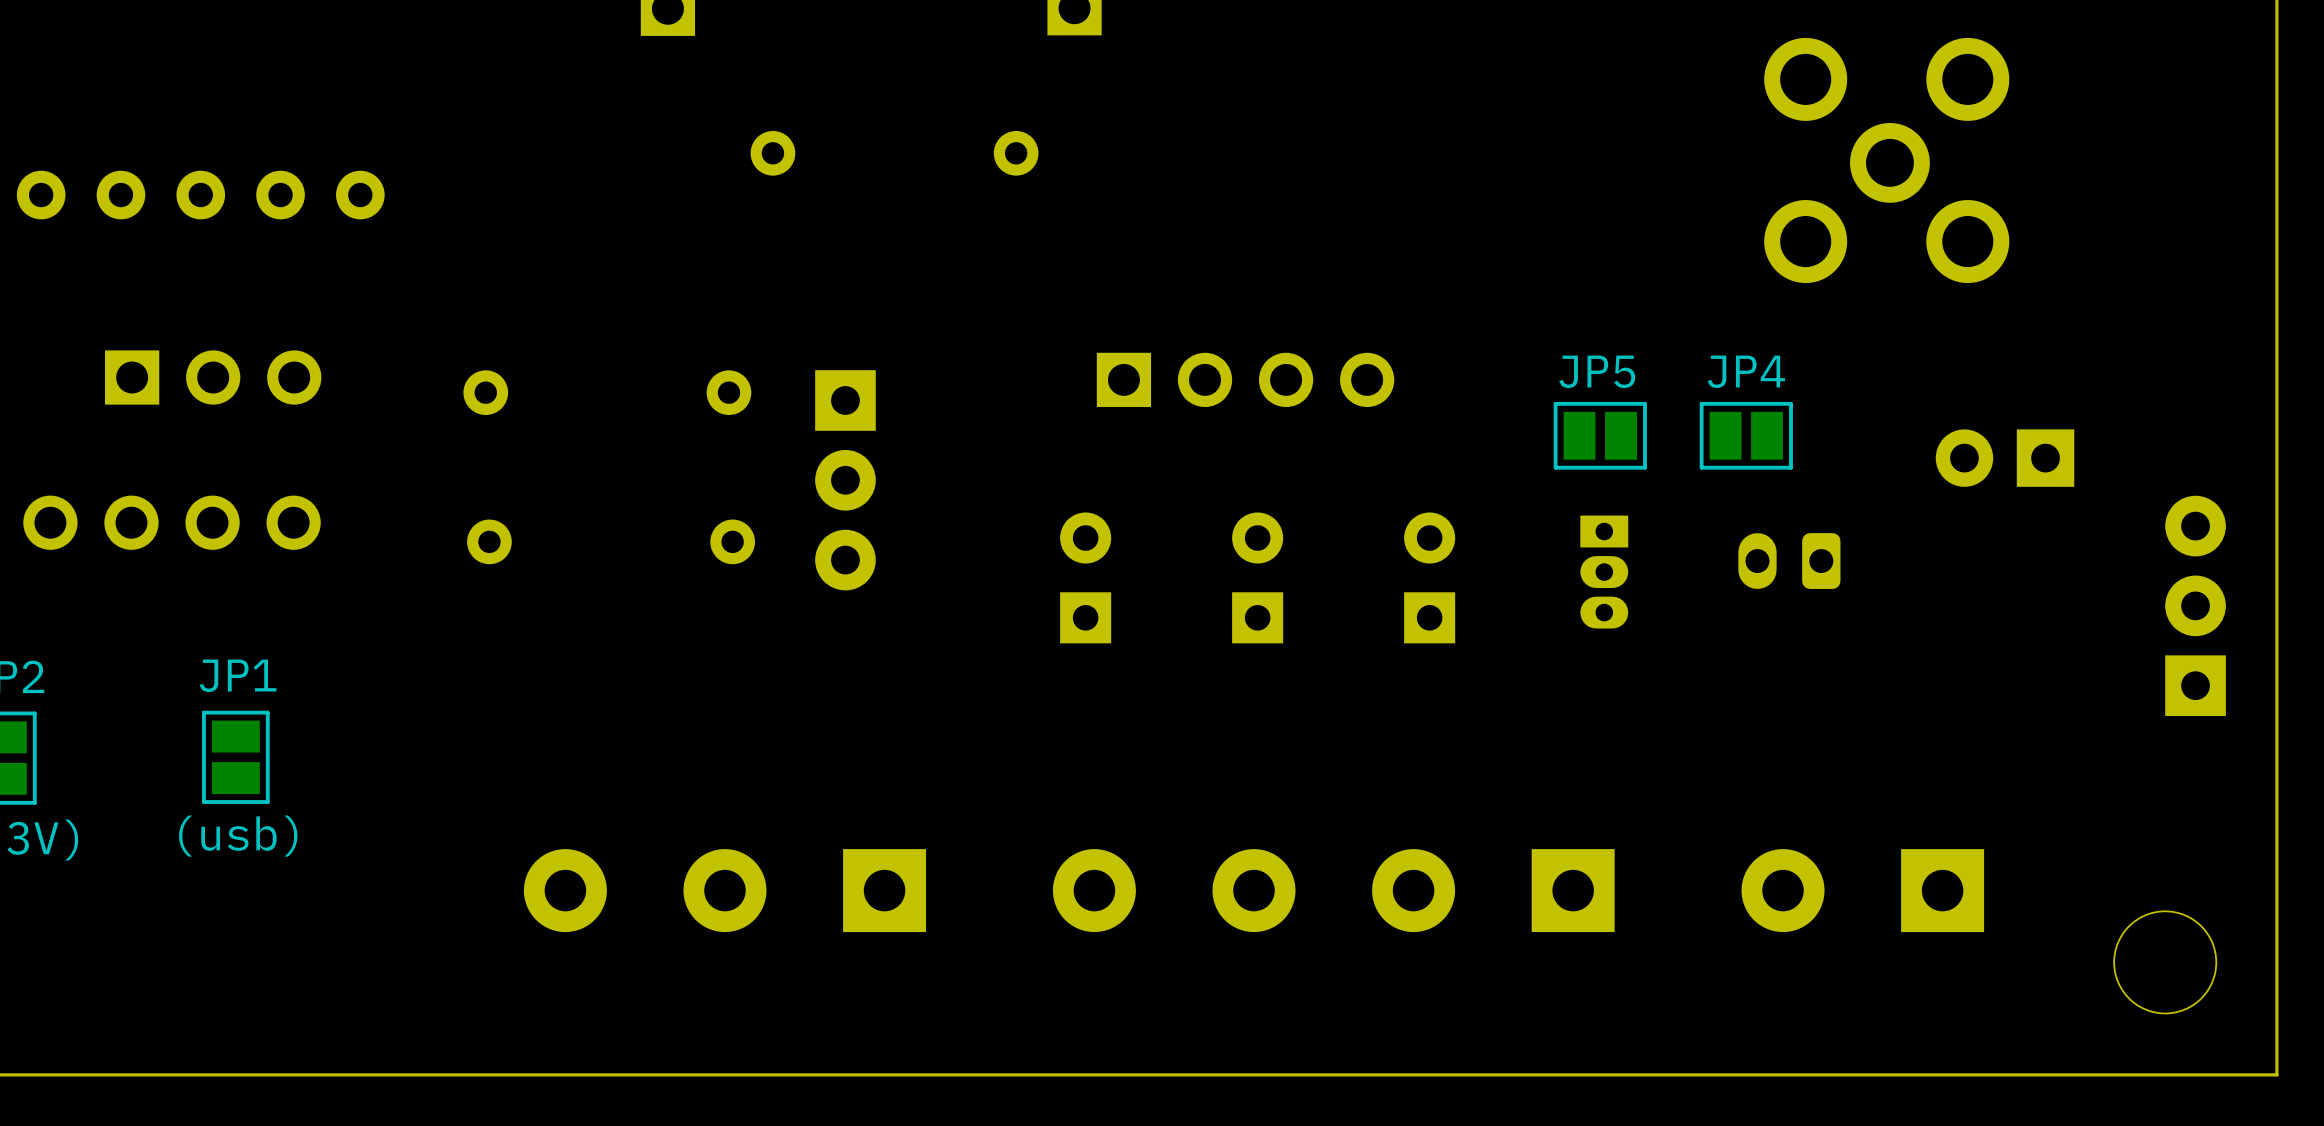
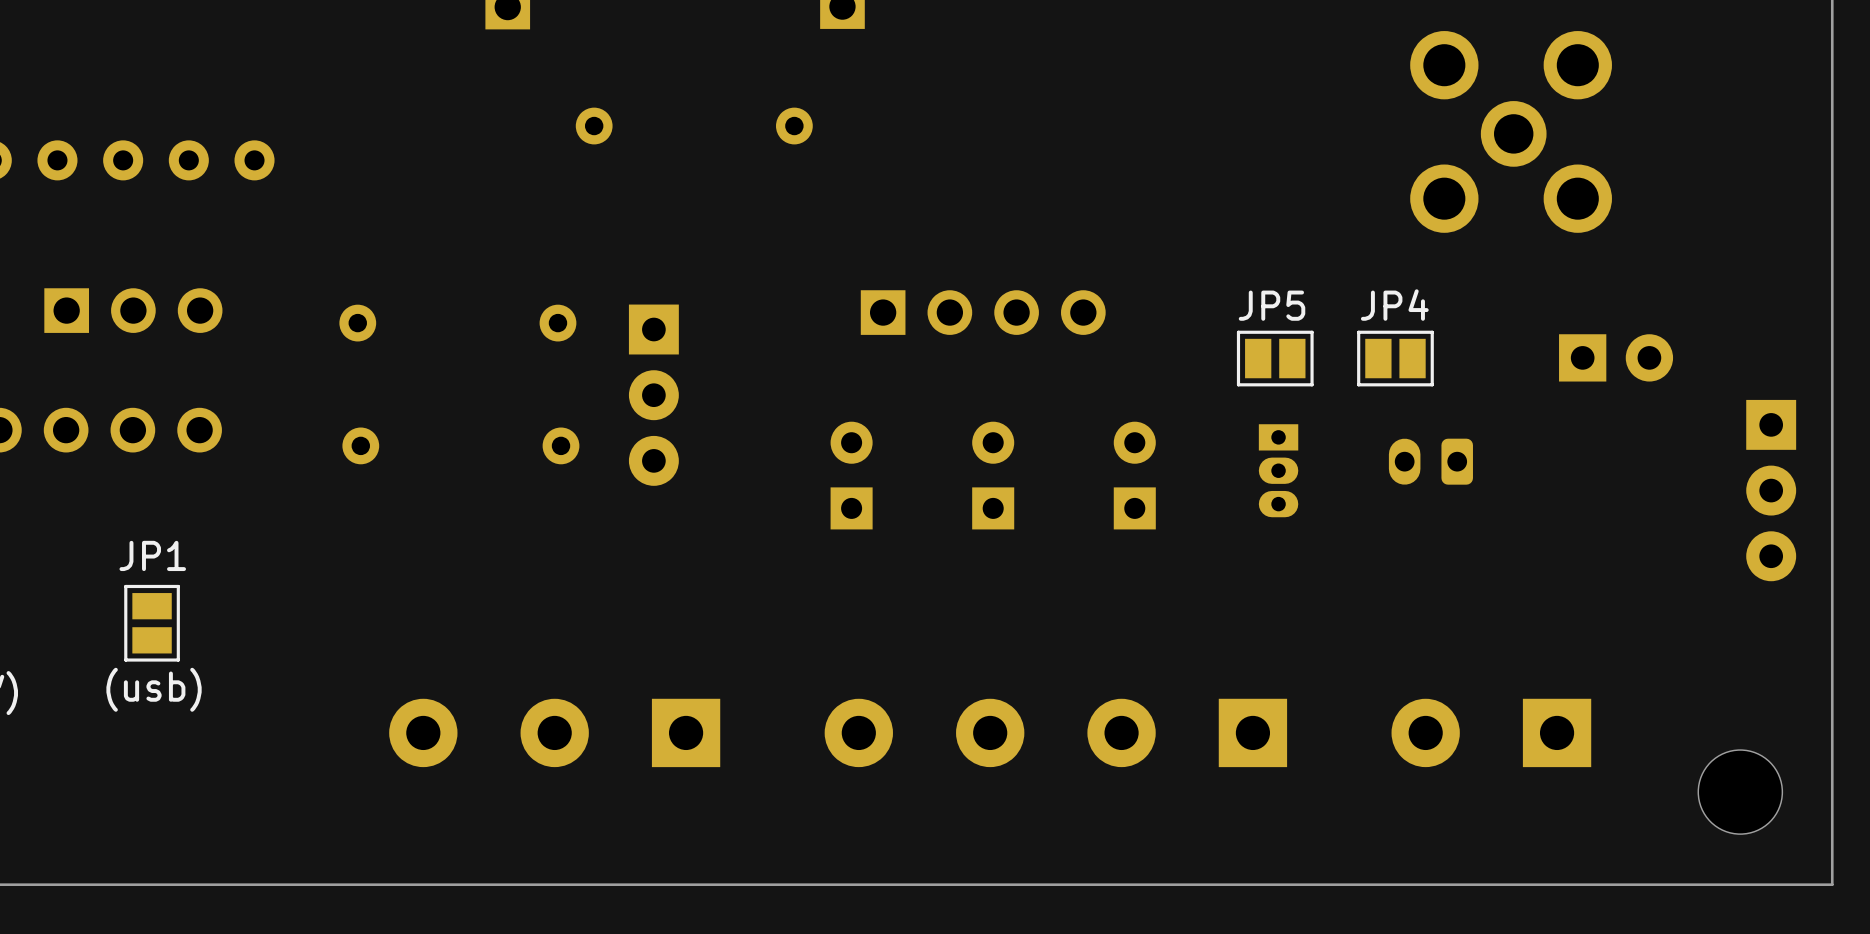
part rotation: 0° (2005, 458) -> 180° (1616, 357)
part rotation: 0° (2195, 605) -> 180° (1771, 490)

